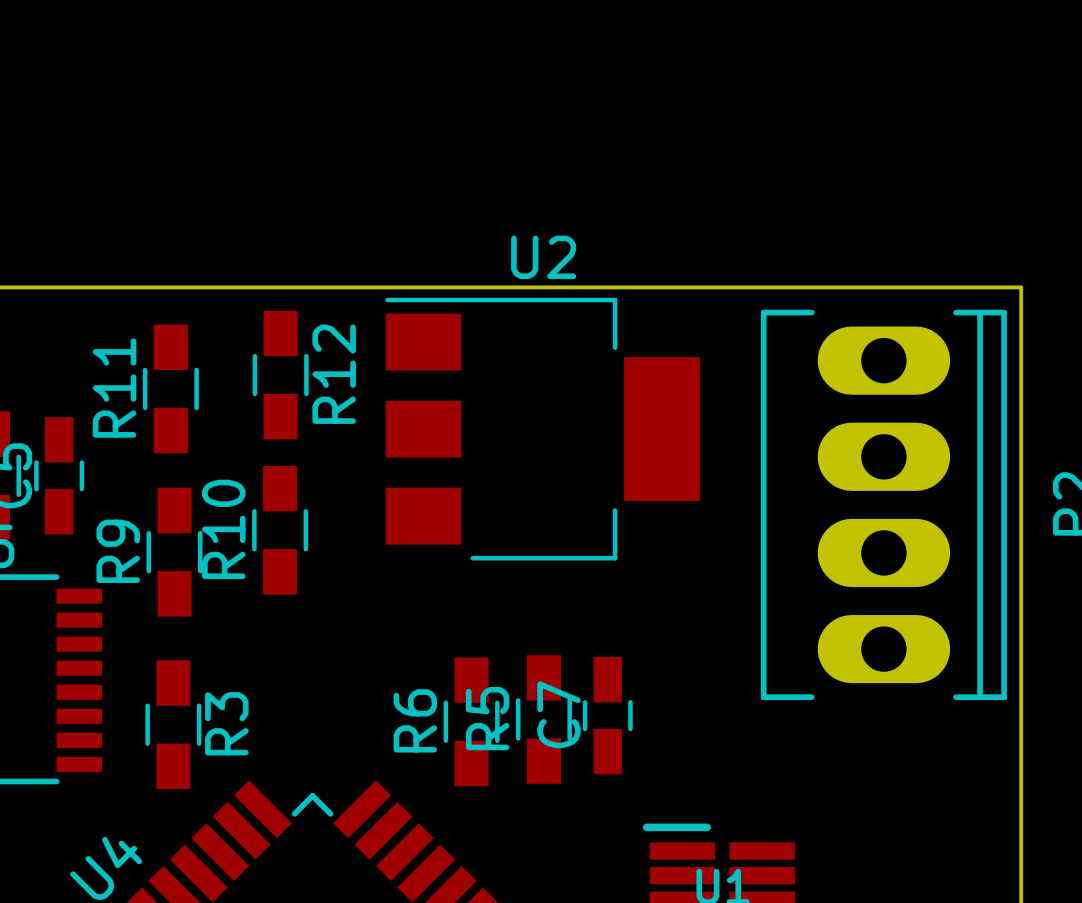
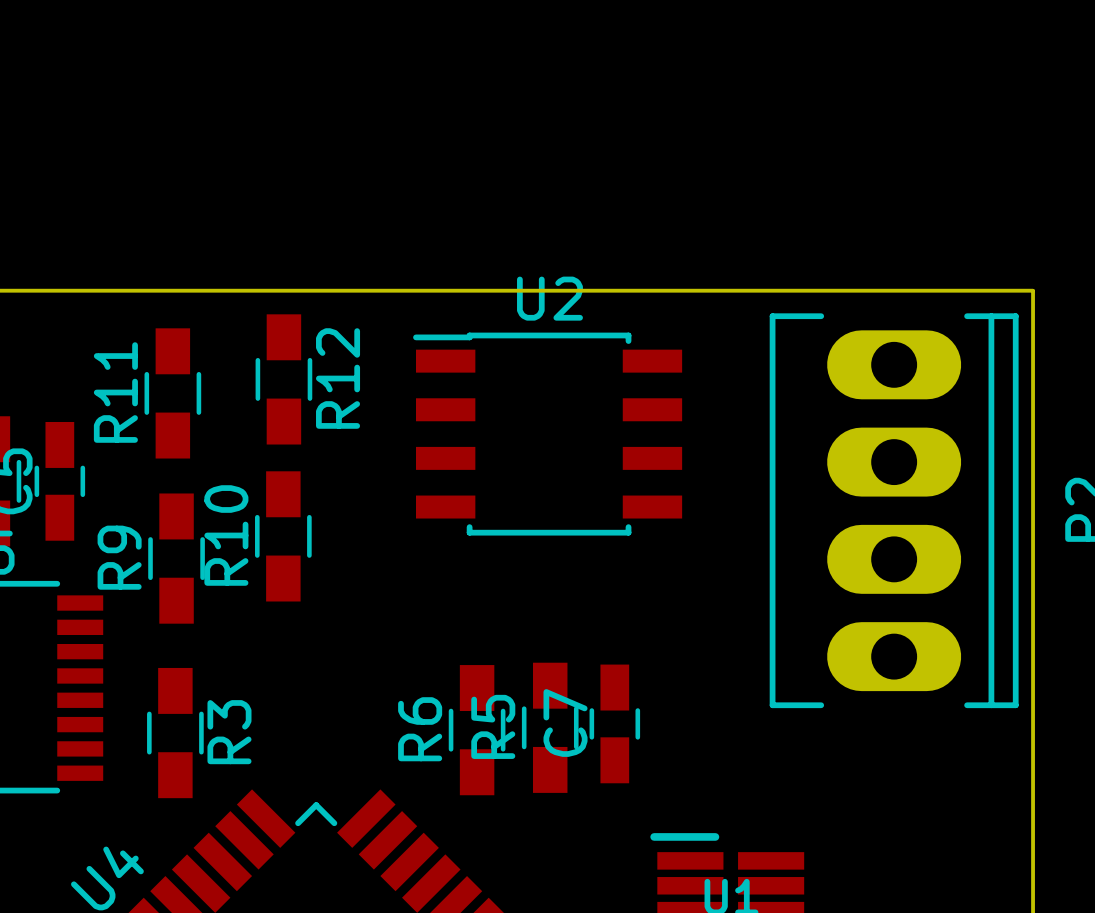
U2 footprint: [385, 297, 700, 561] -> [413, 332, 683, 536]

